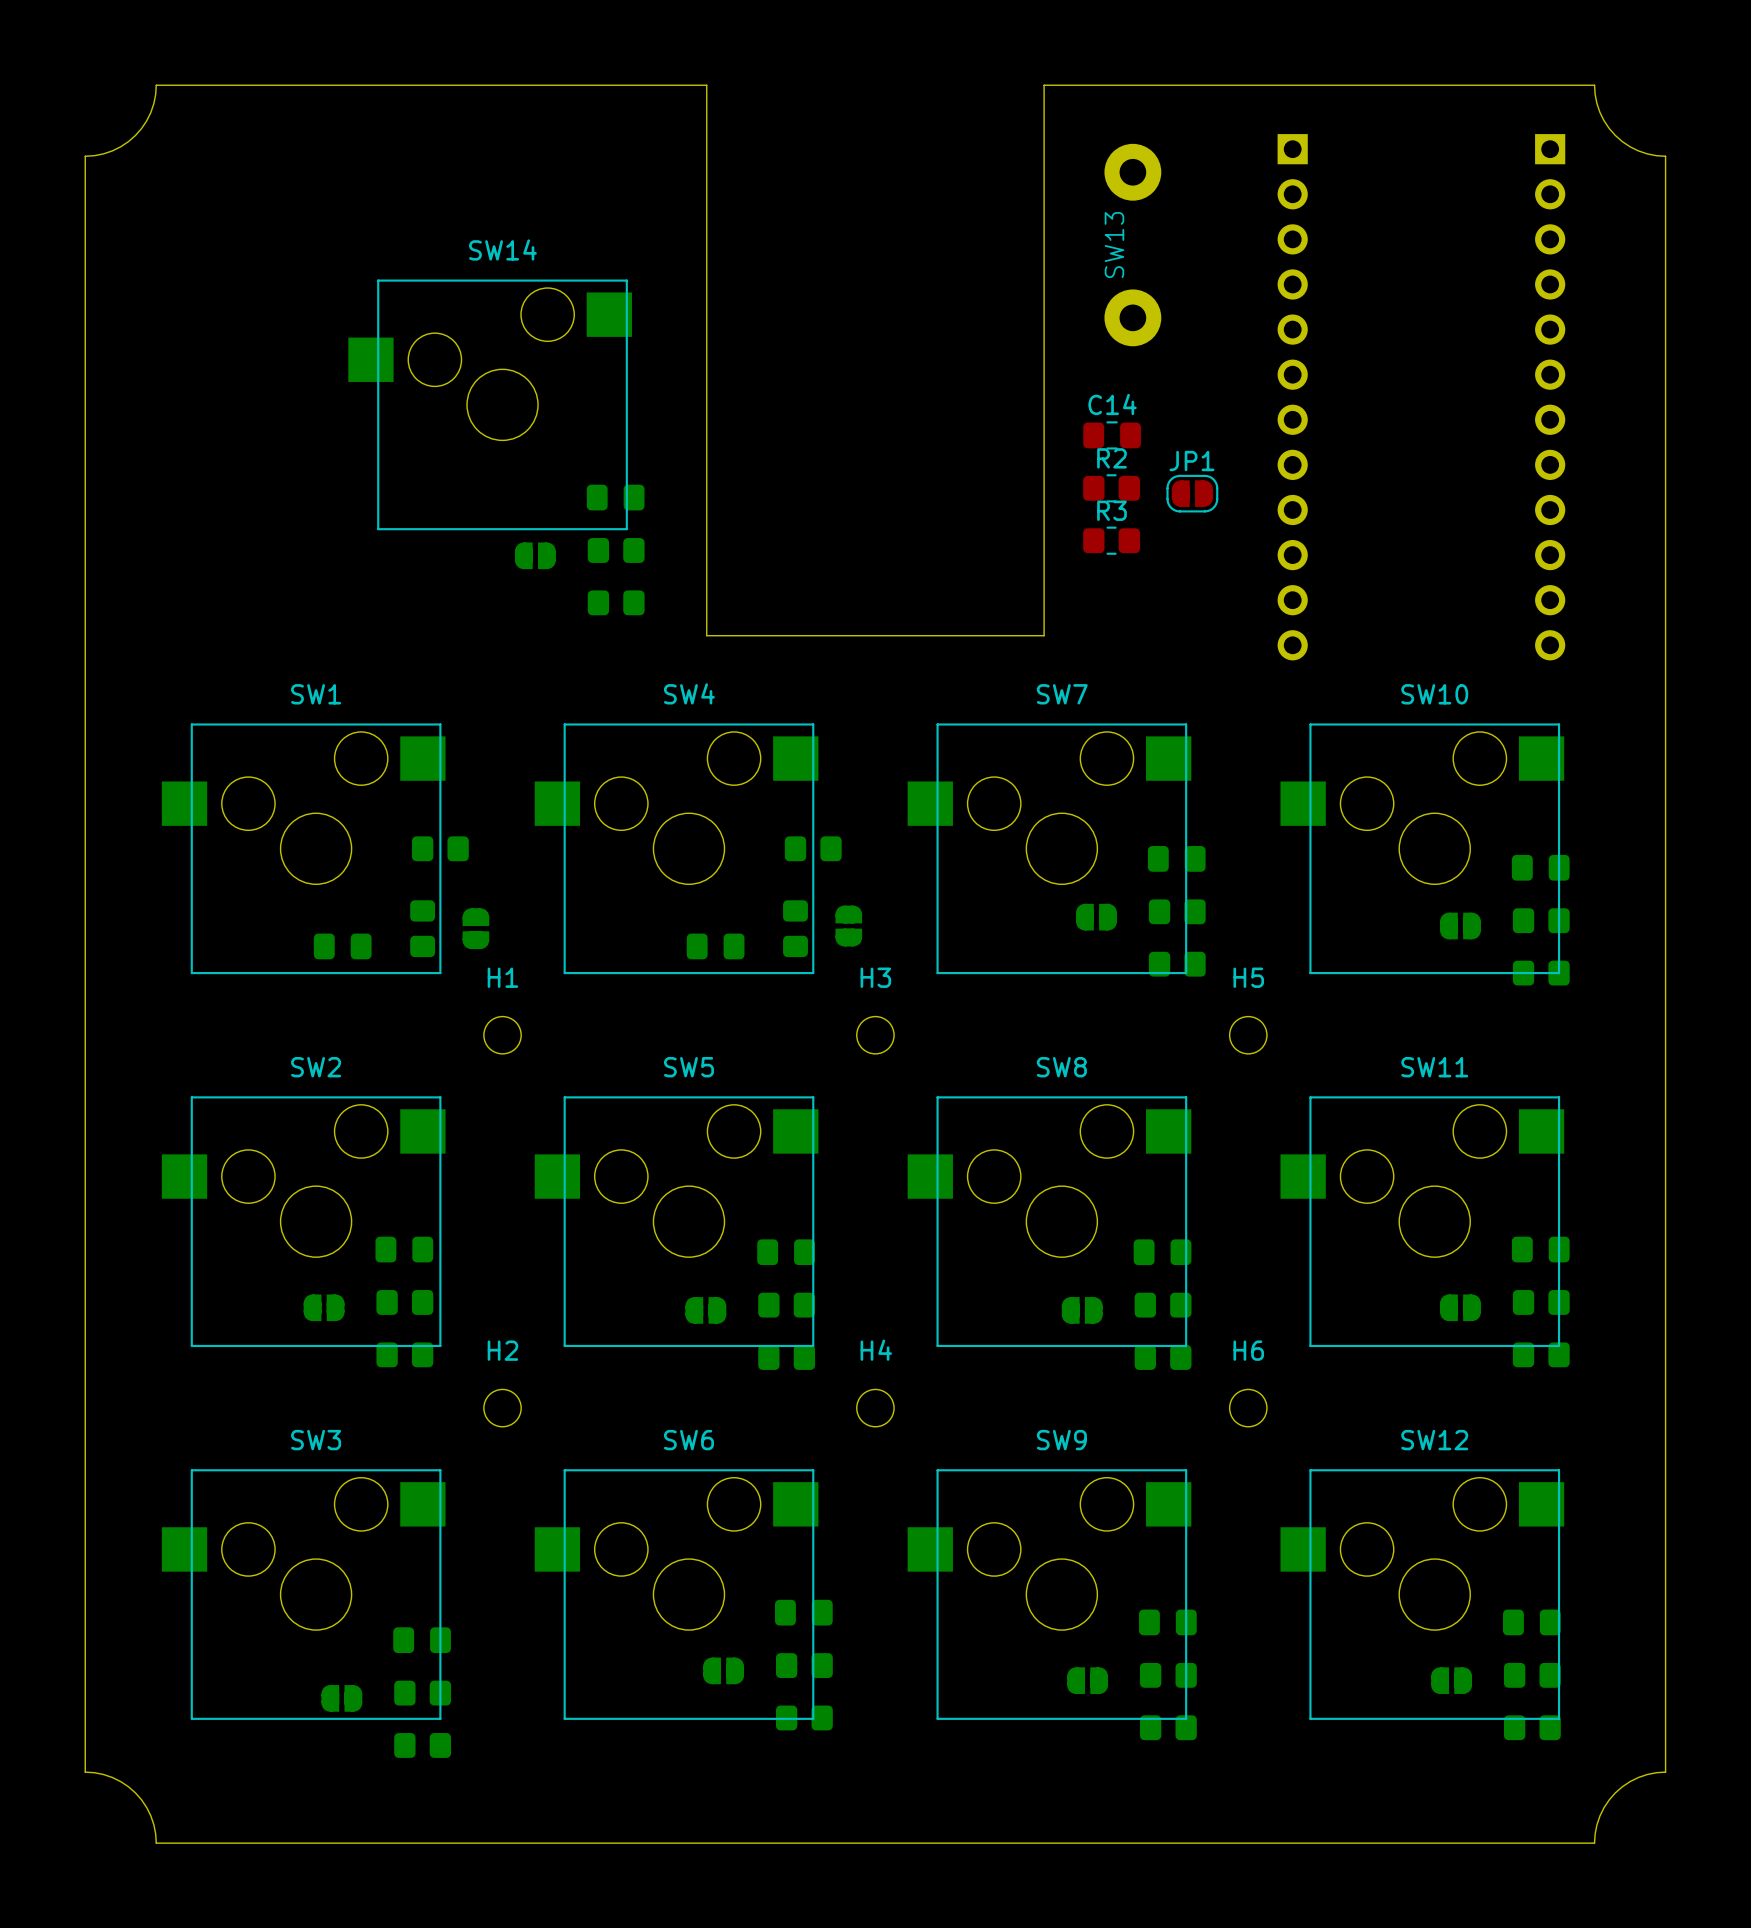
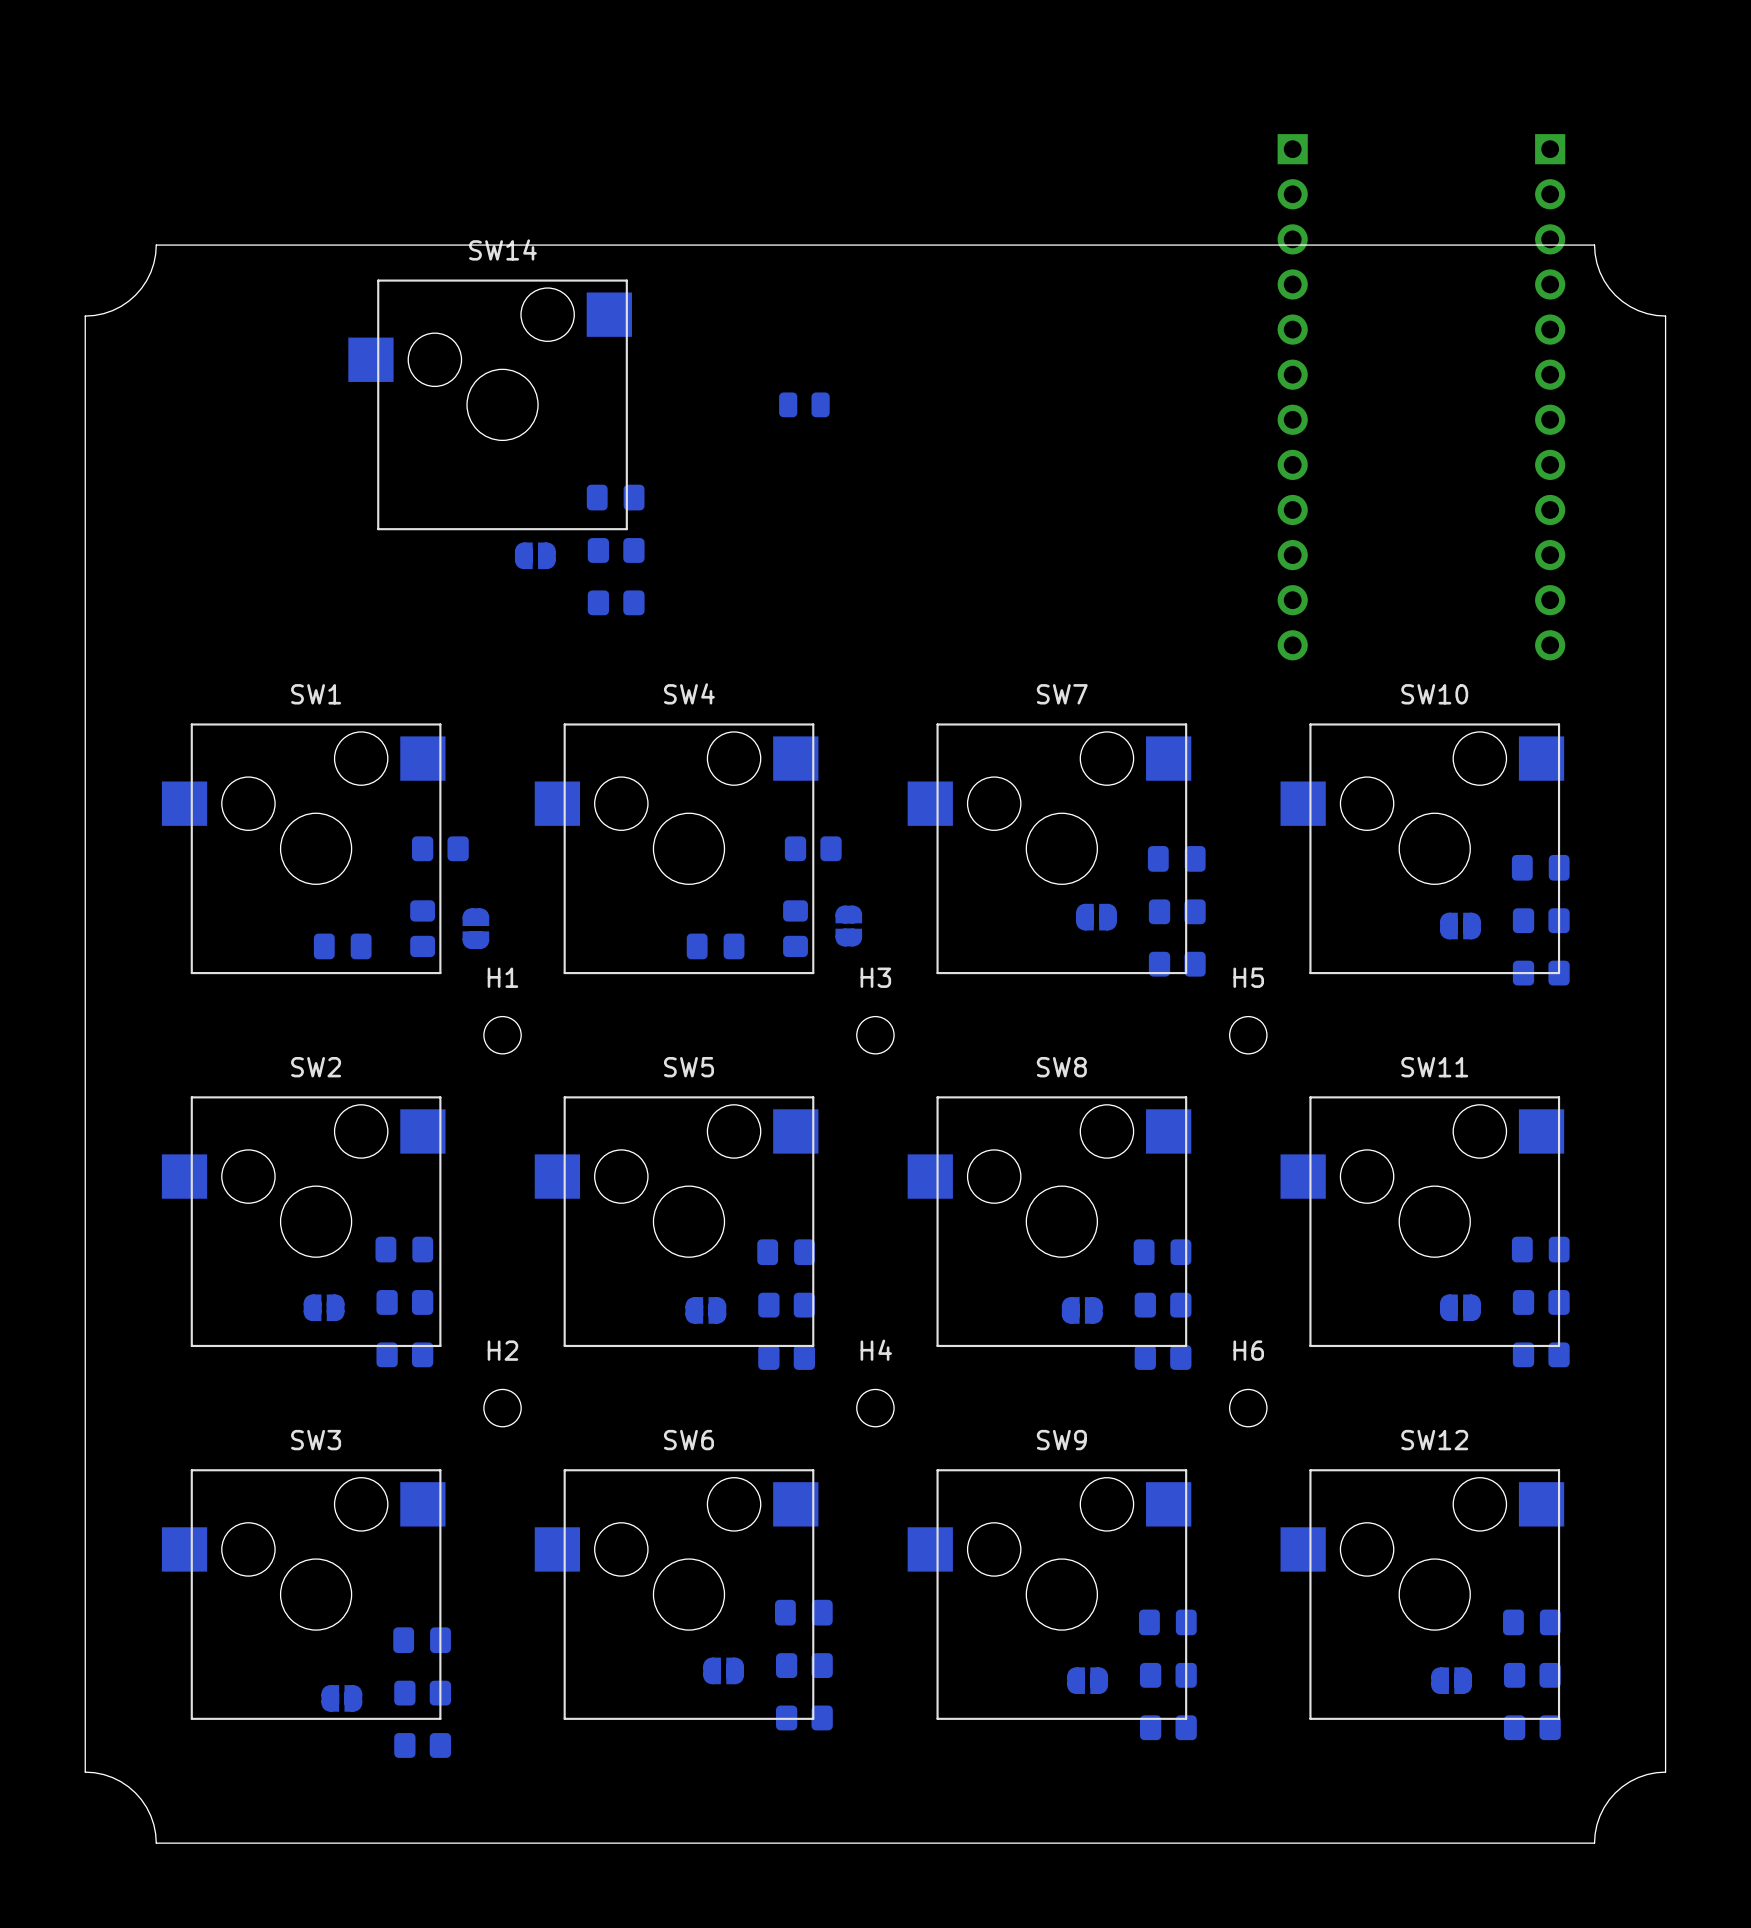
SW13: (1132, 245) -> none
board edge: (85, 316) (85, 156) (112, 150) (135, 135) (150, 112) (156, 85) (706, 85) (706, 635) (1044, 635) (1044, 85) (1594, 85) (1599, 112) (1615, 135) (1638, 150) (1665, 156) (1665, 316) -> (85, 316) (112, 310) (135, 295) (150, 272) (156, 245) (1594, 245) (1599, 272) (1615, 295) (1638, 310) (1665, 316)
part: none -> (804, 404)
C14: (1112, 435) -> none
R2: (1111, 488) -> none
JP1: (1192, 493) -> none
R3: (1111, 540) -> none

